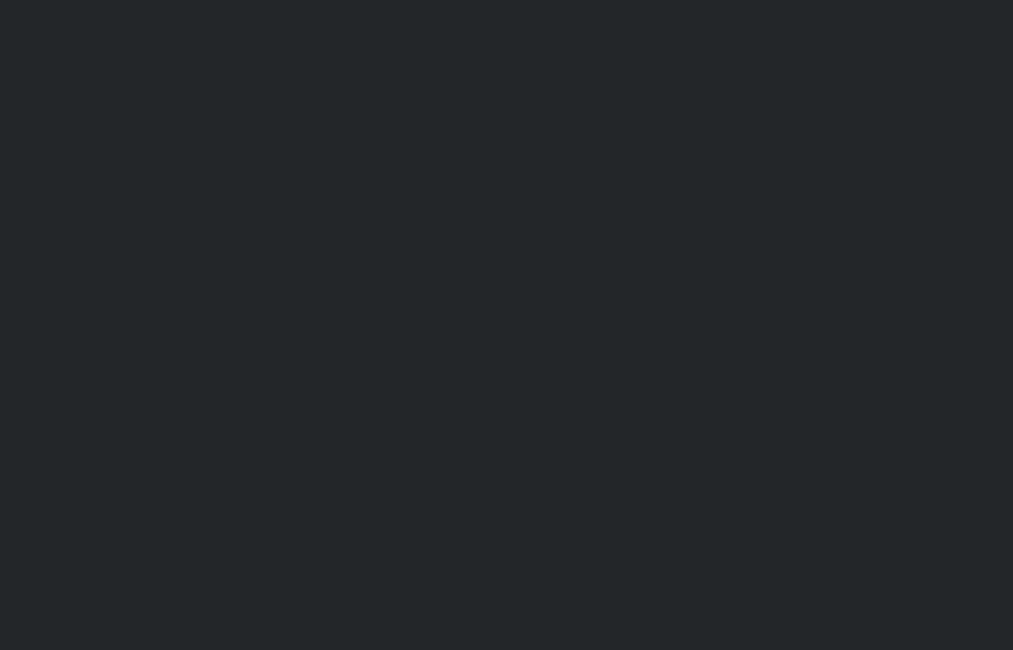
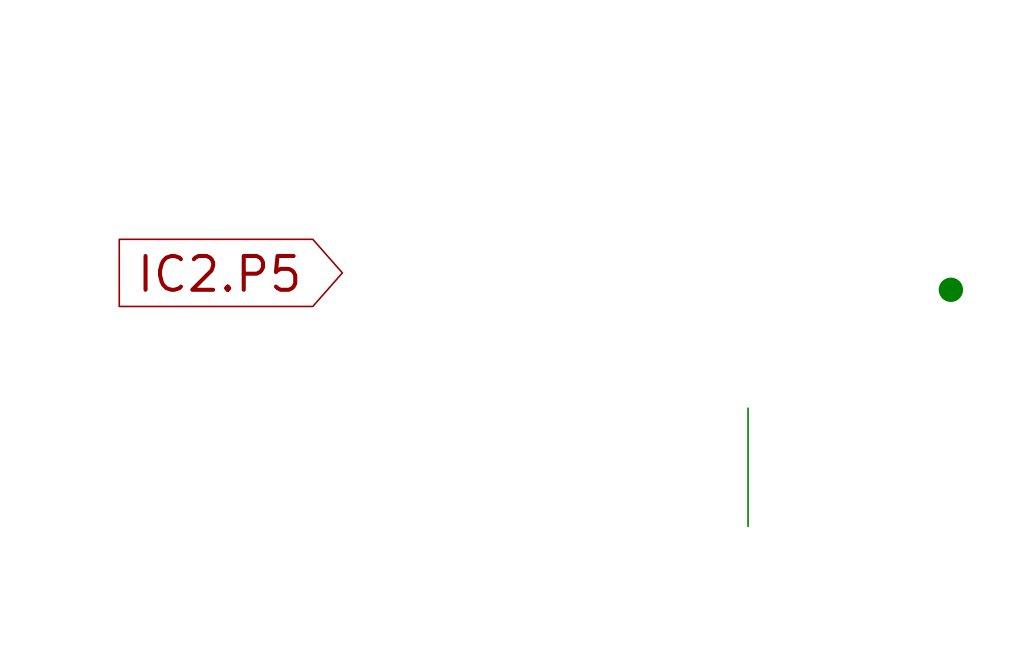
global label: none -> IC2.P5 (220, 272)
junction: none -> (950, 289)
wire: none -> (748, 408) (748, 526)

